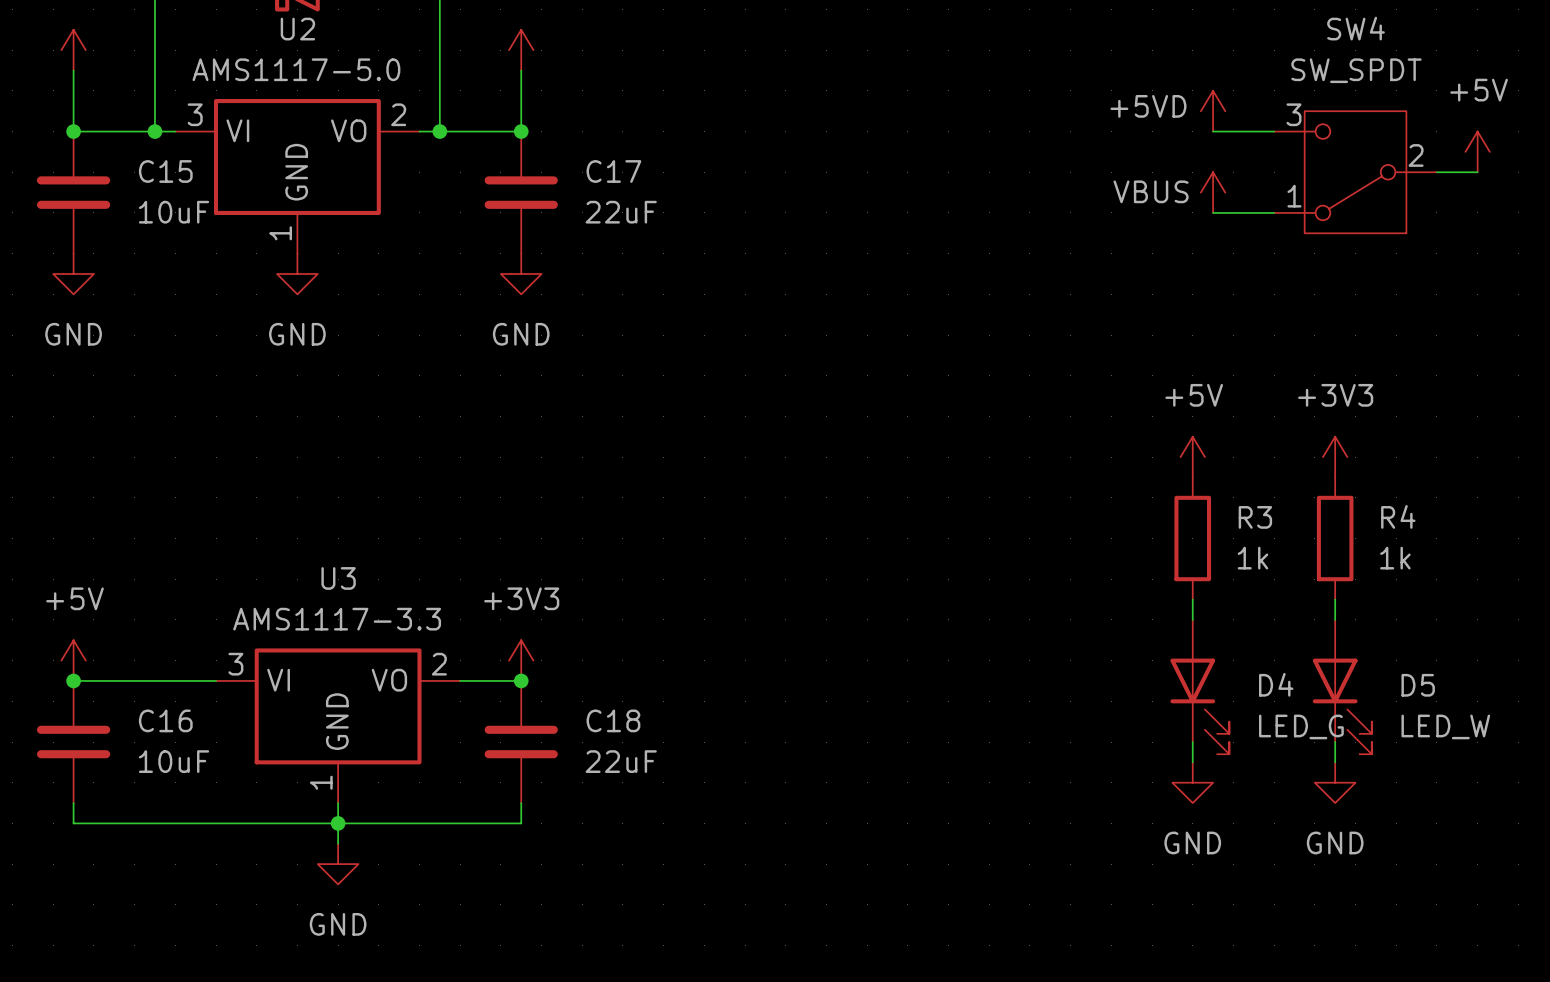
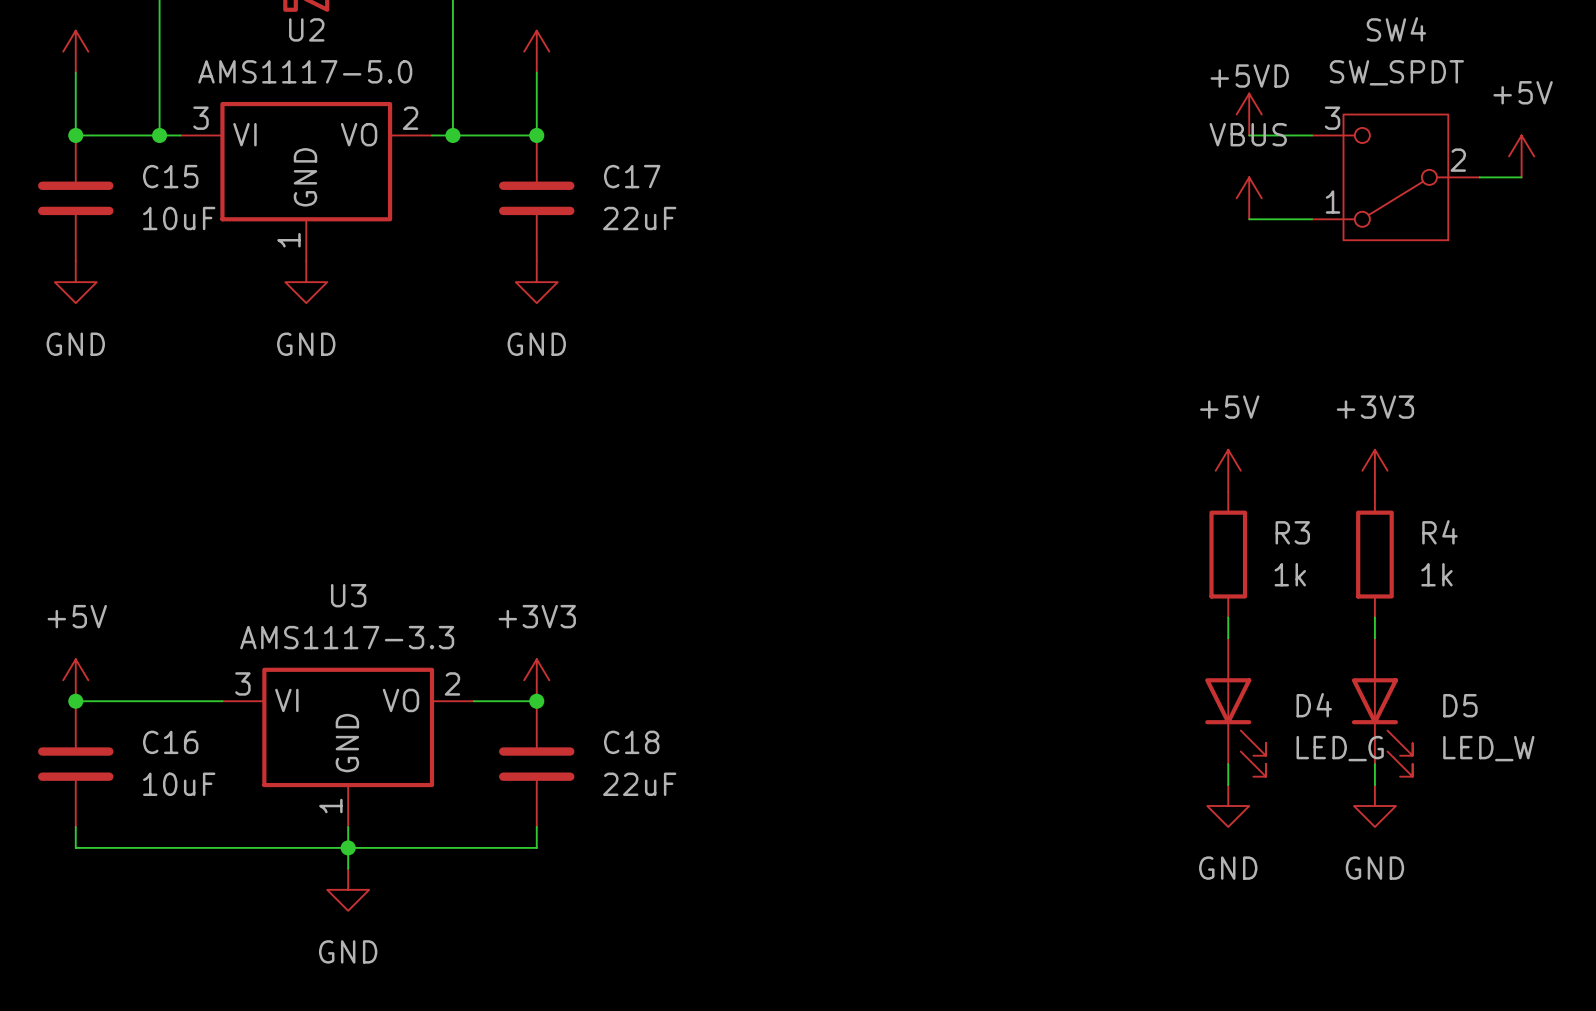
power symbol text position: +5VD (1148, 106) -> +5VD (1249, 76)
power symbol text position: VBUS (1151, 191) -> VBUS (1248, 134)

